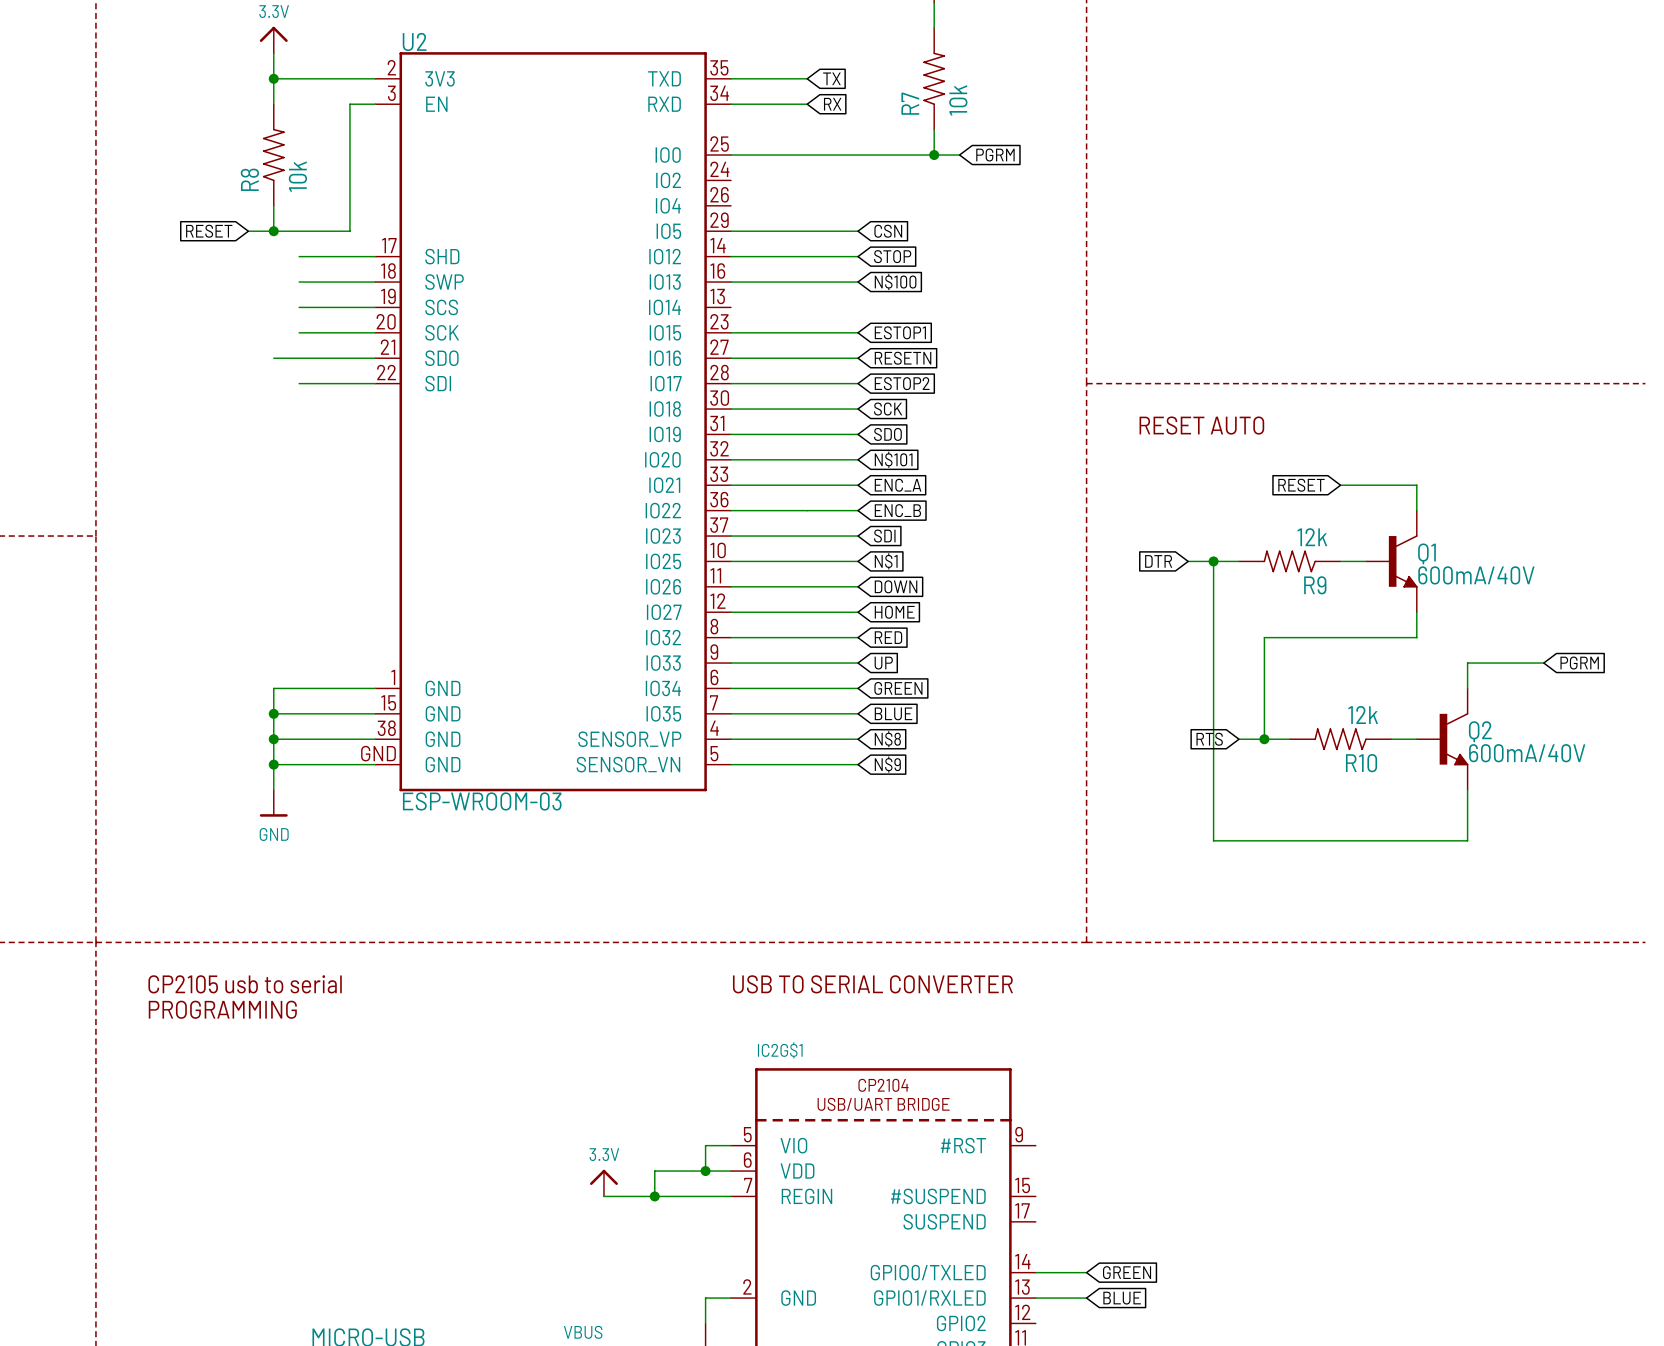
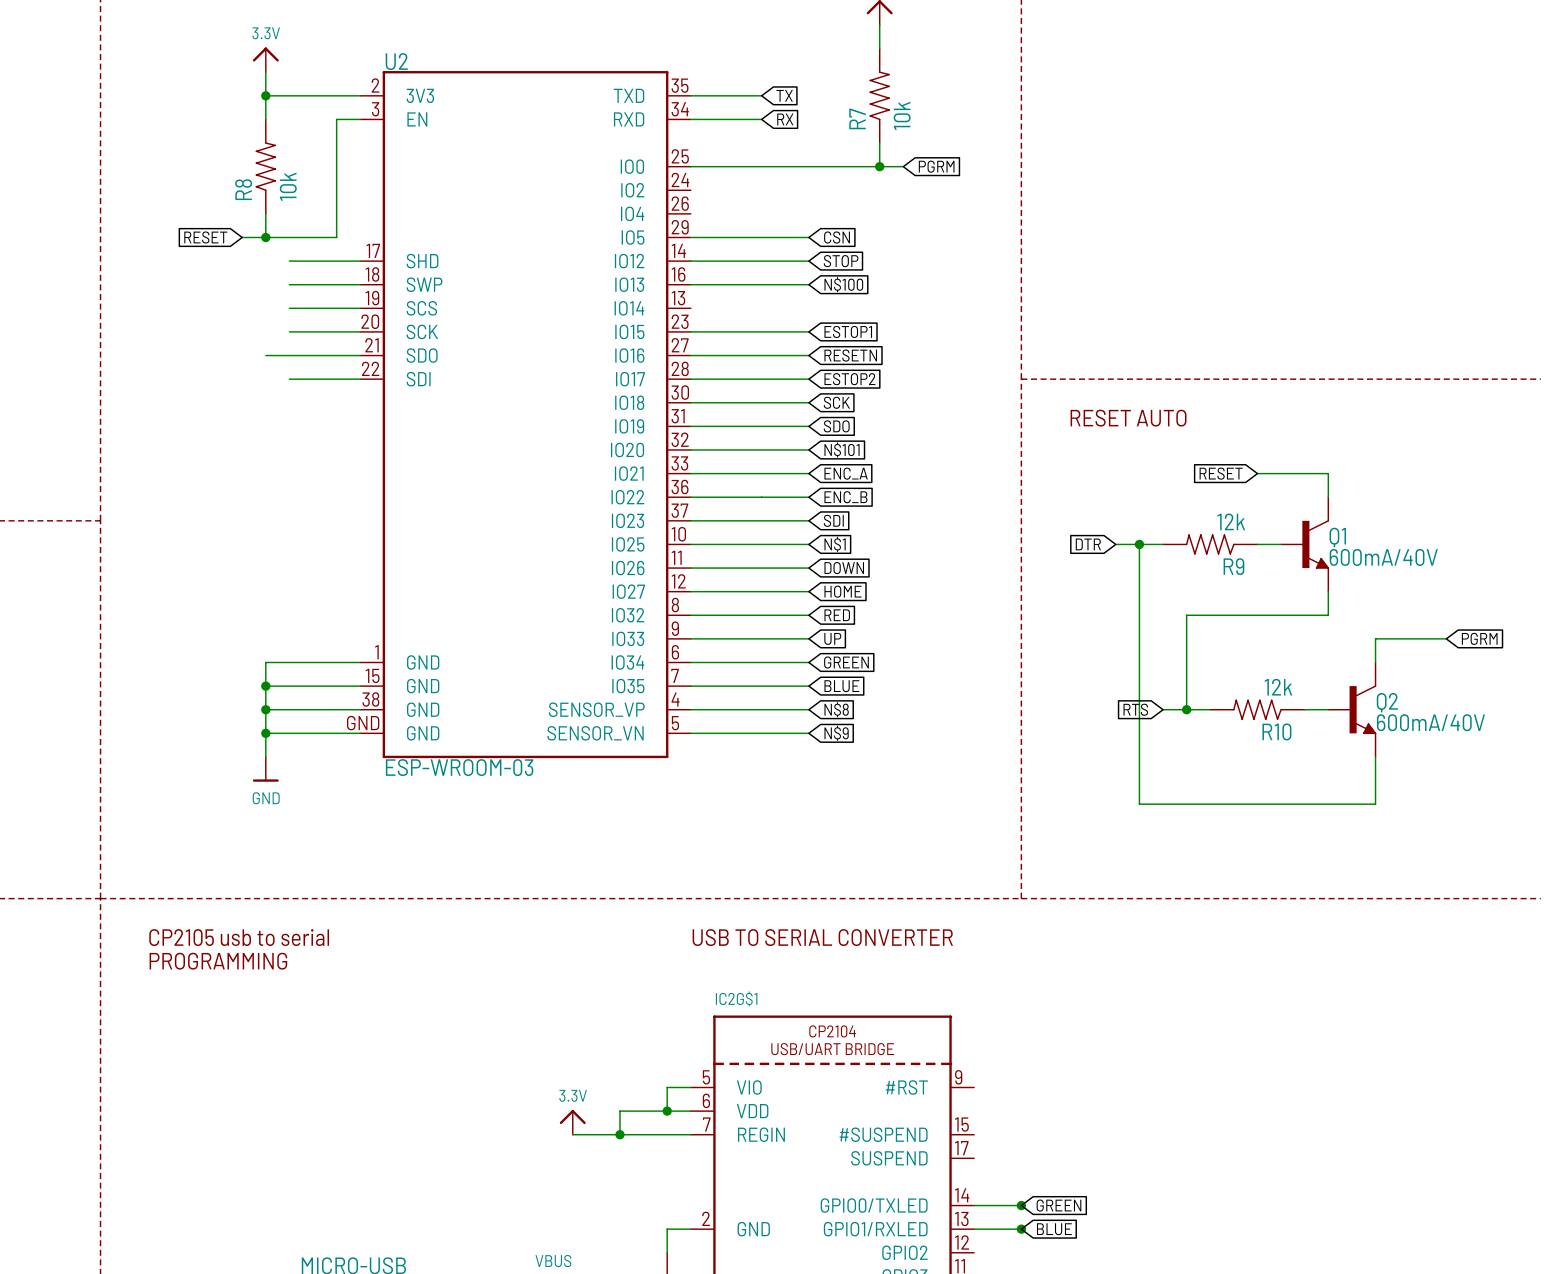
junction: none -> (1021, 1205)
junction: none -> (1021, 1229)

